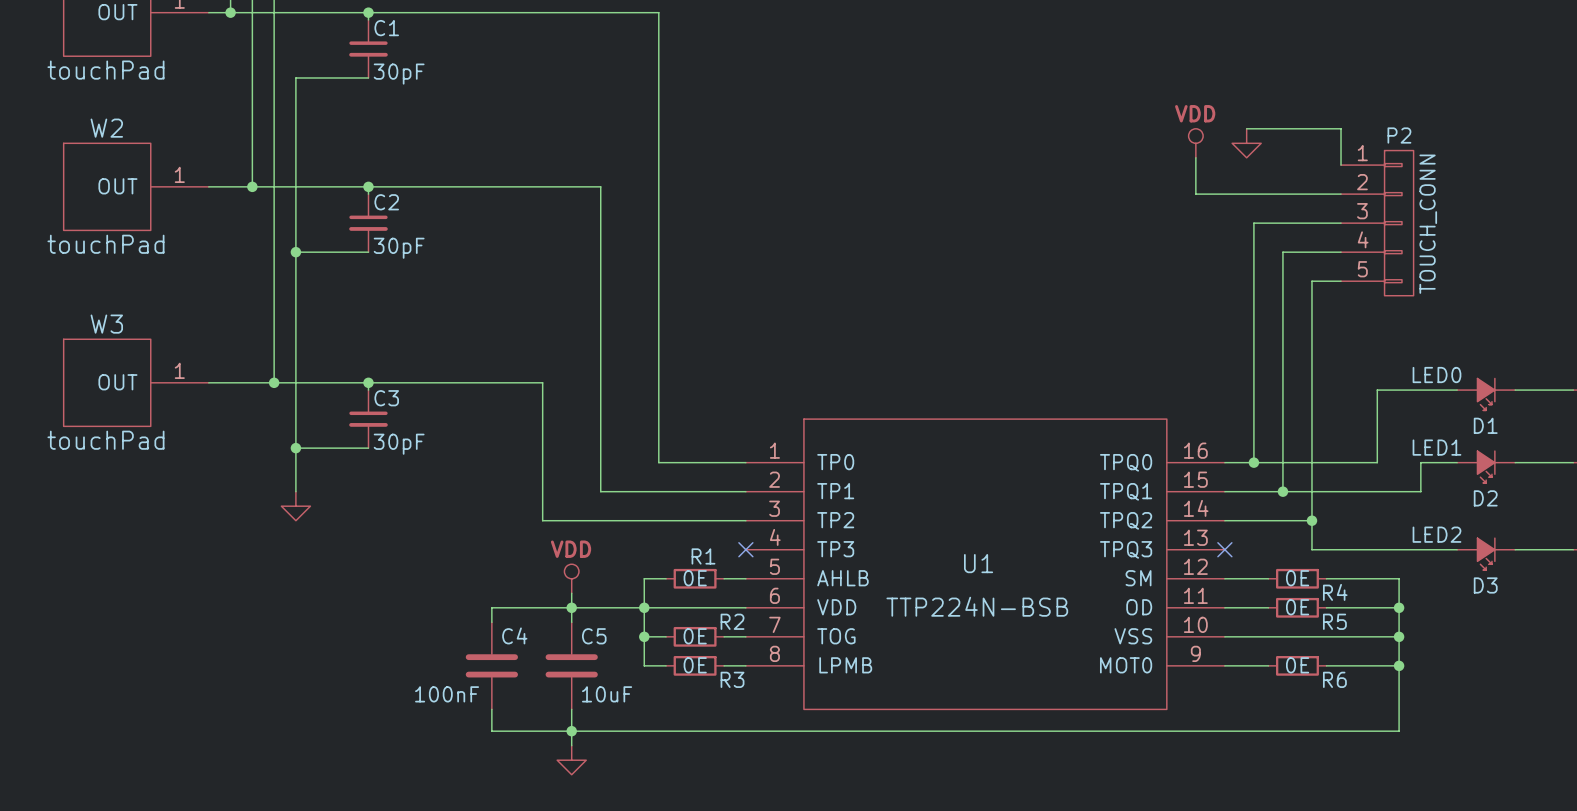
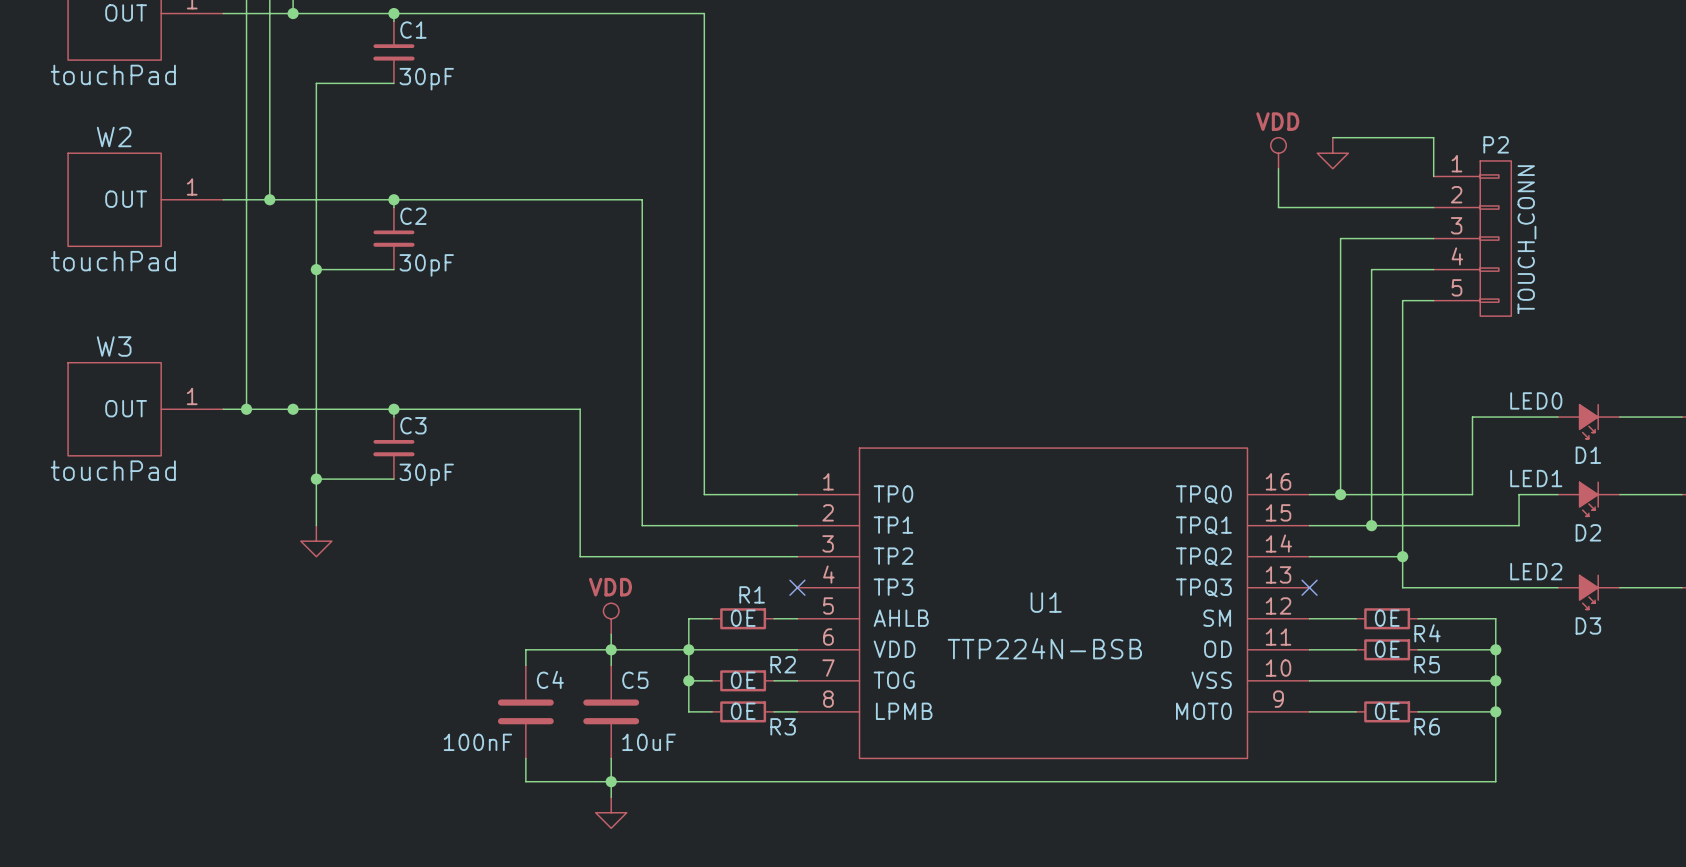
junction position: (230, 12) -> (293, 13)
wire: (274, 12) (274, 382) -> (246, 13) (246, 409)
junction: none -> (246, 409)

